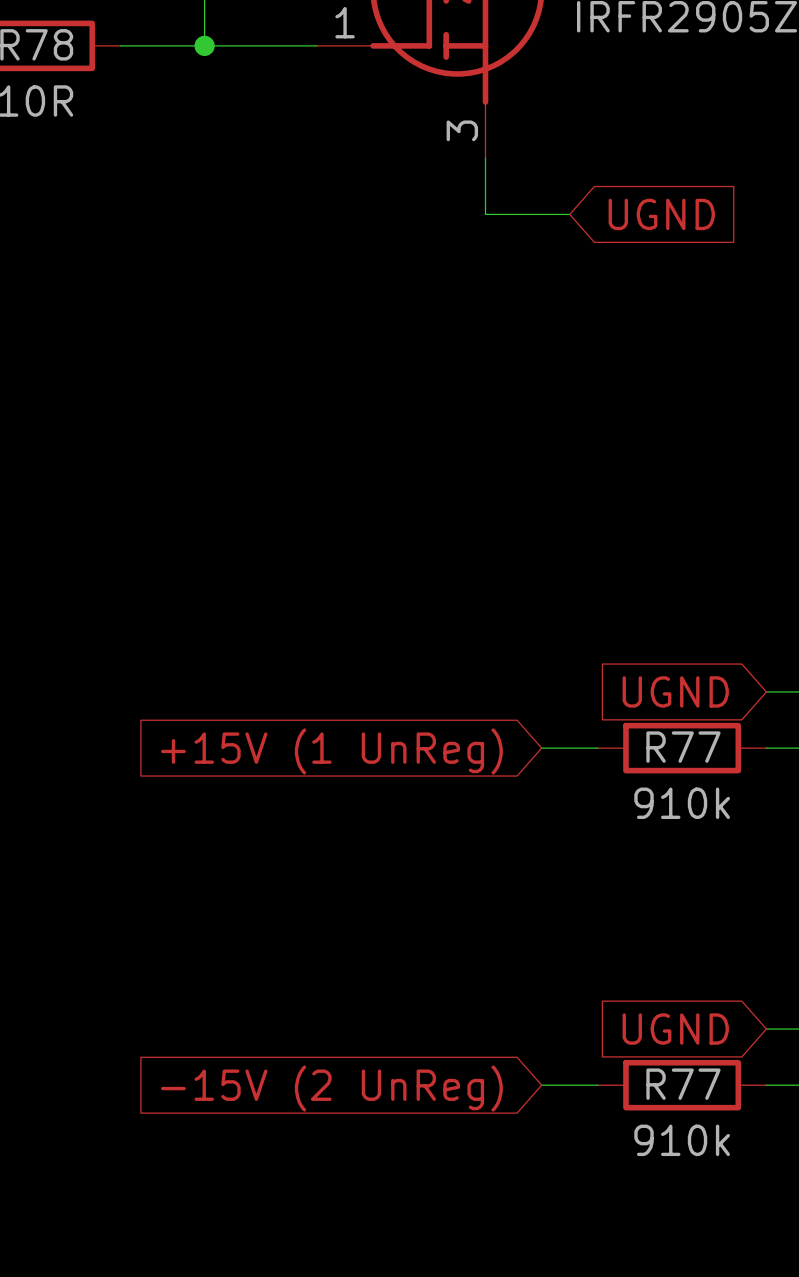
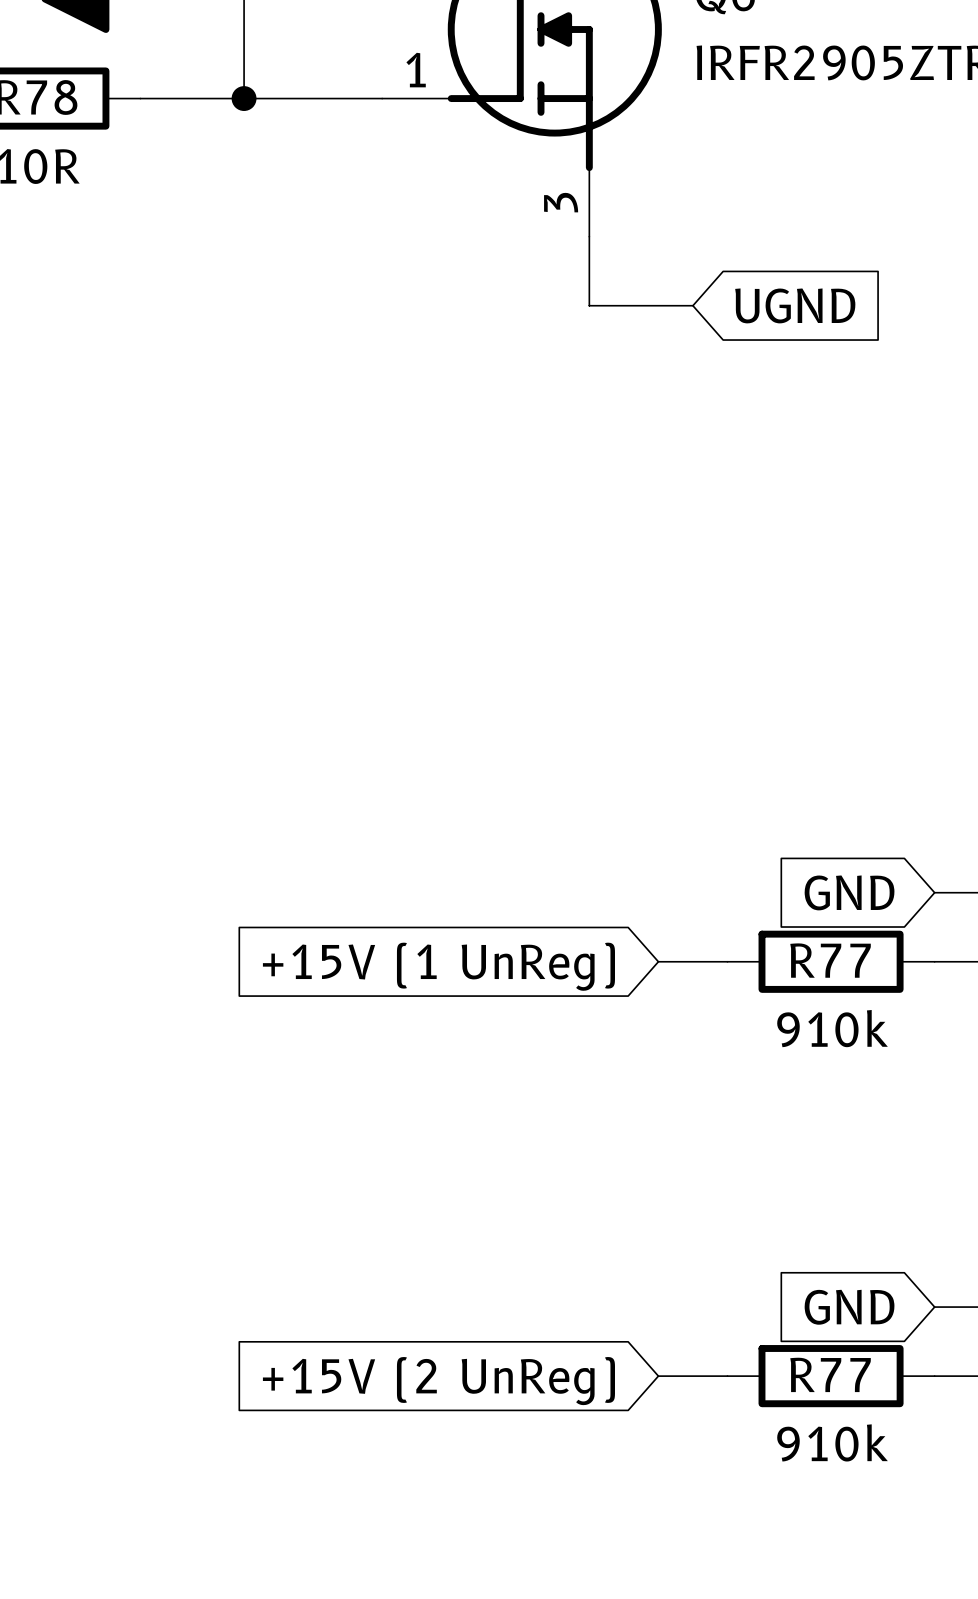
global label: UGND (675, 691) -> GND (849, 892)
global label: UGND (675, 1029) -> GND (849, 1307)
global label: -15V (2 UnReg) (331, 1088) -> +15V (2 UnReg) (438, 1381)

